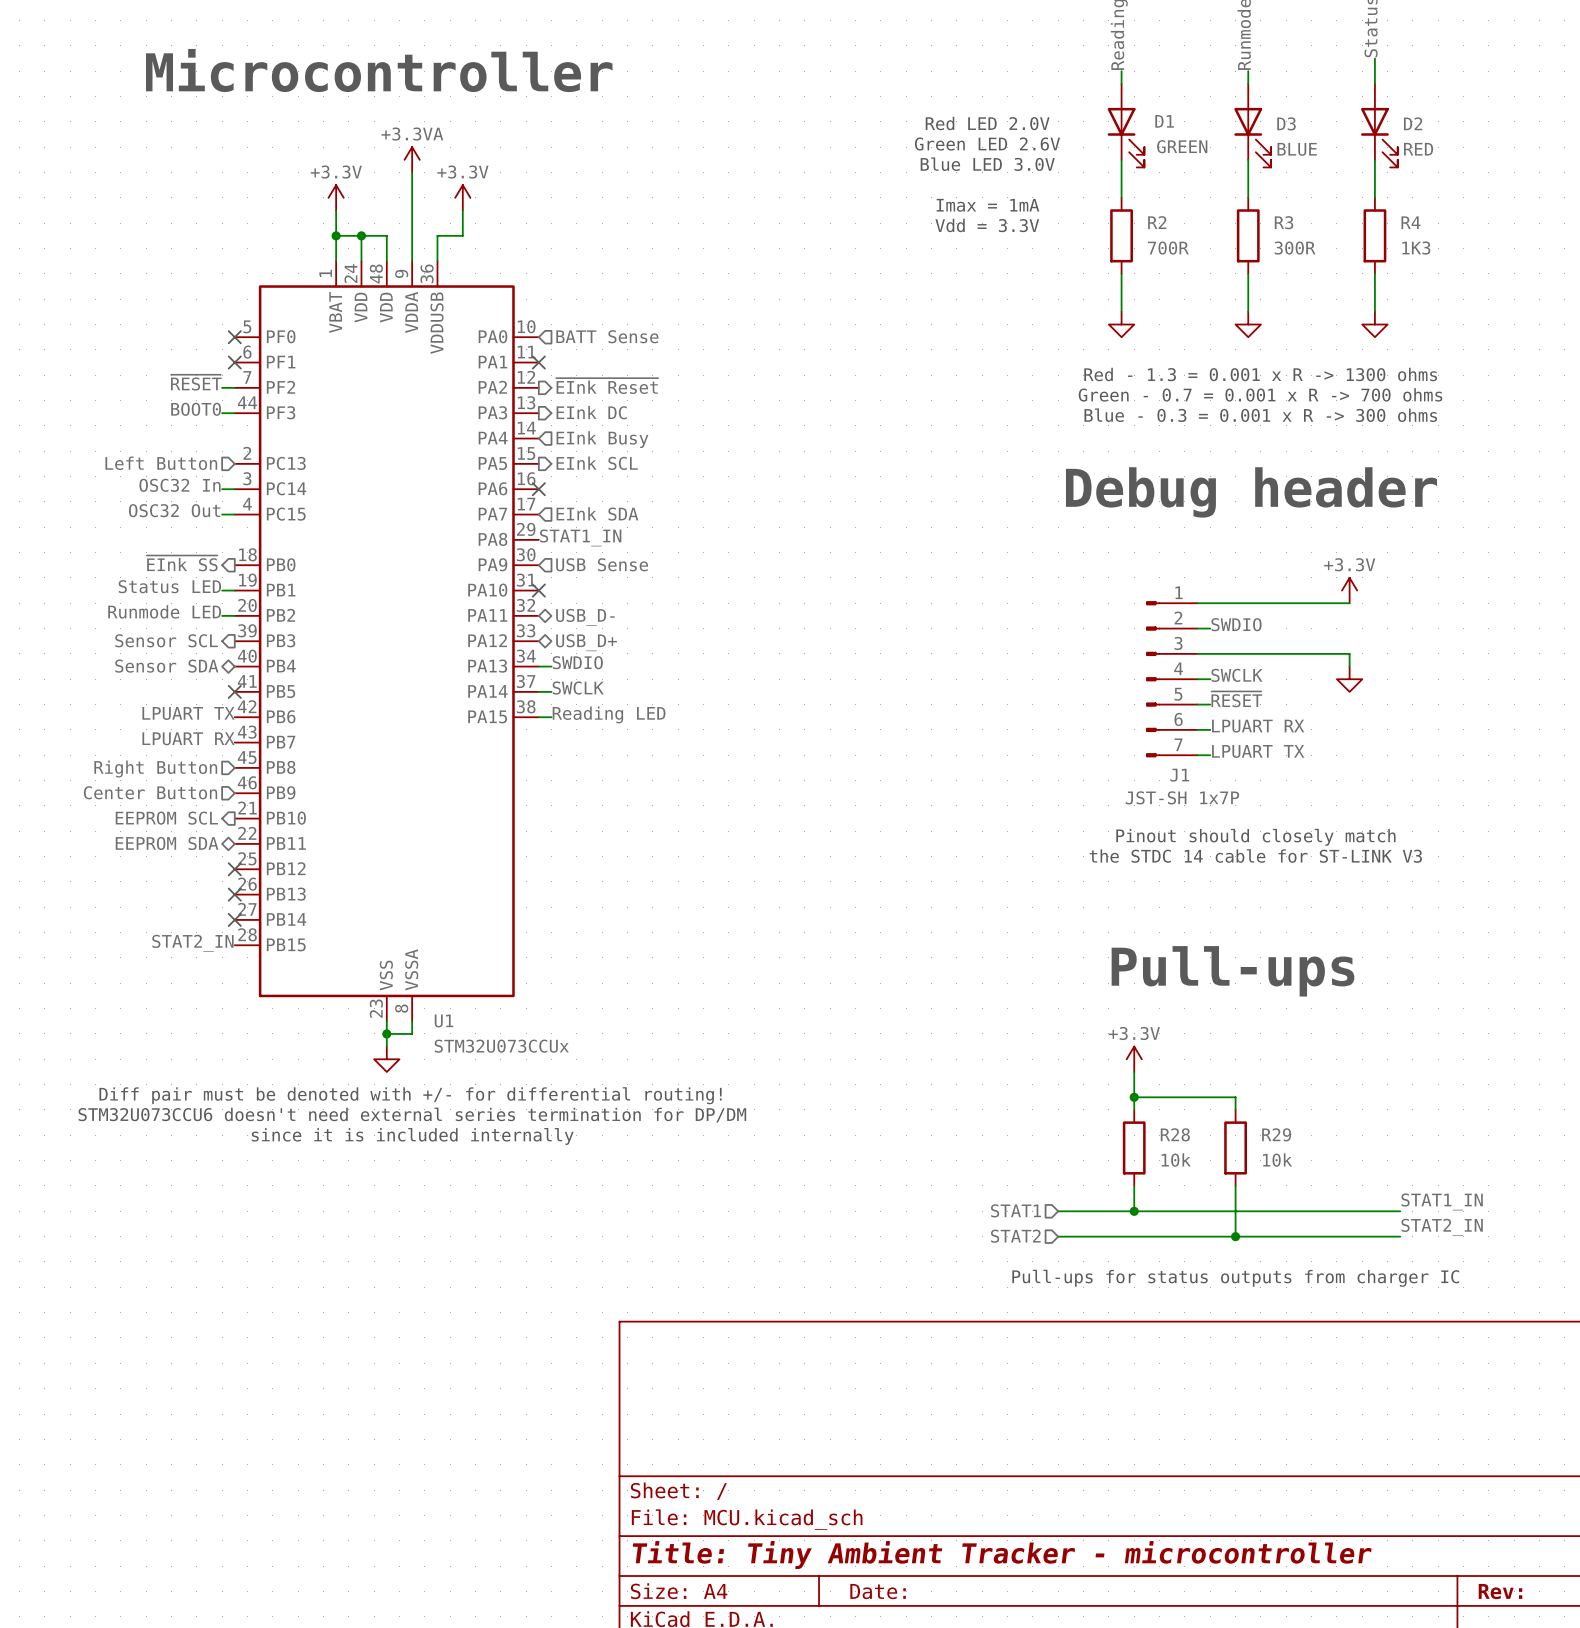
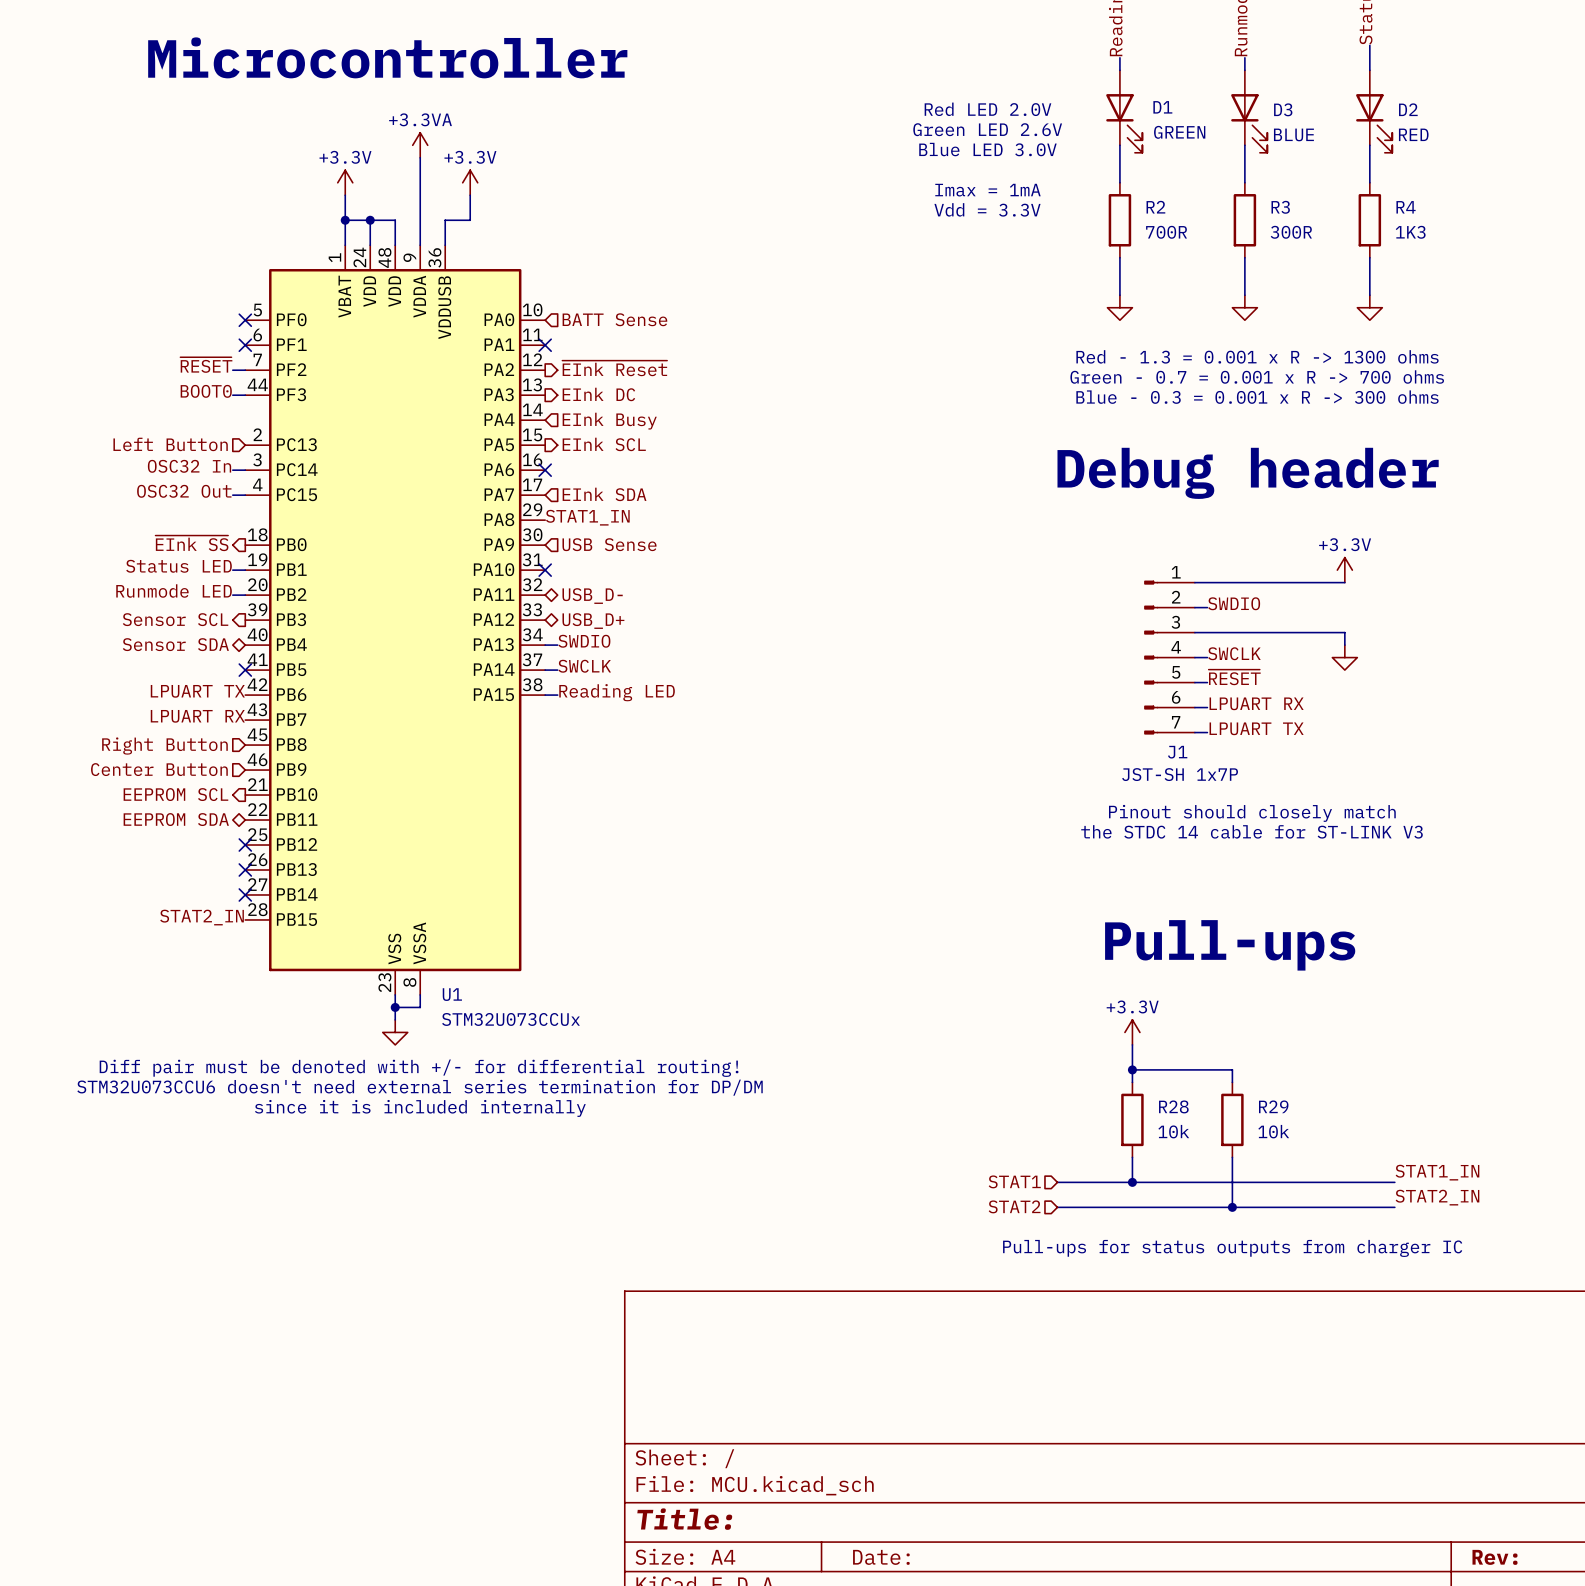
title block: Title: Tiny Ambient Tracker - microcontroller (1002, 1554) -> Title: (684, 1519)

